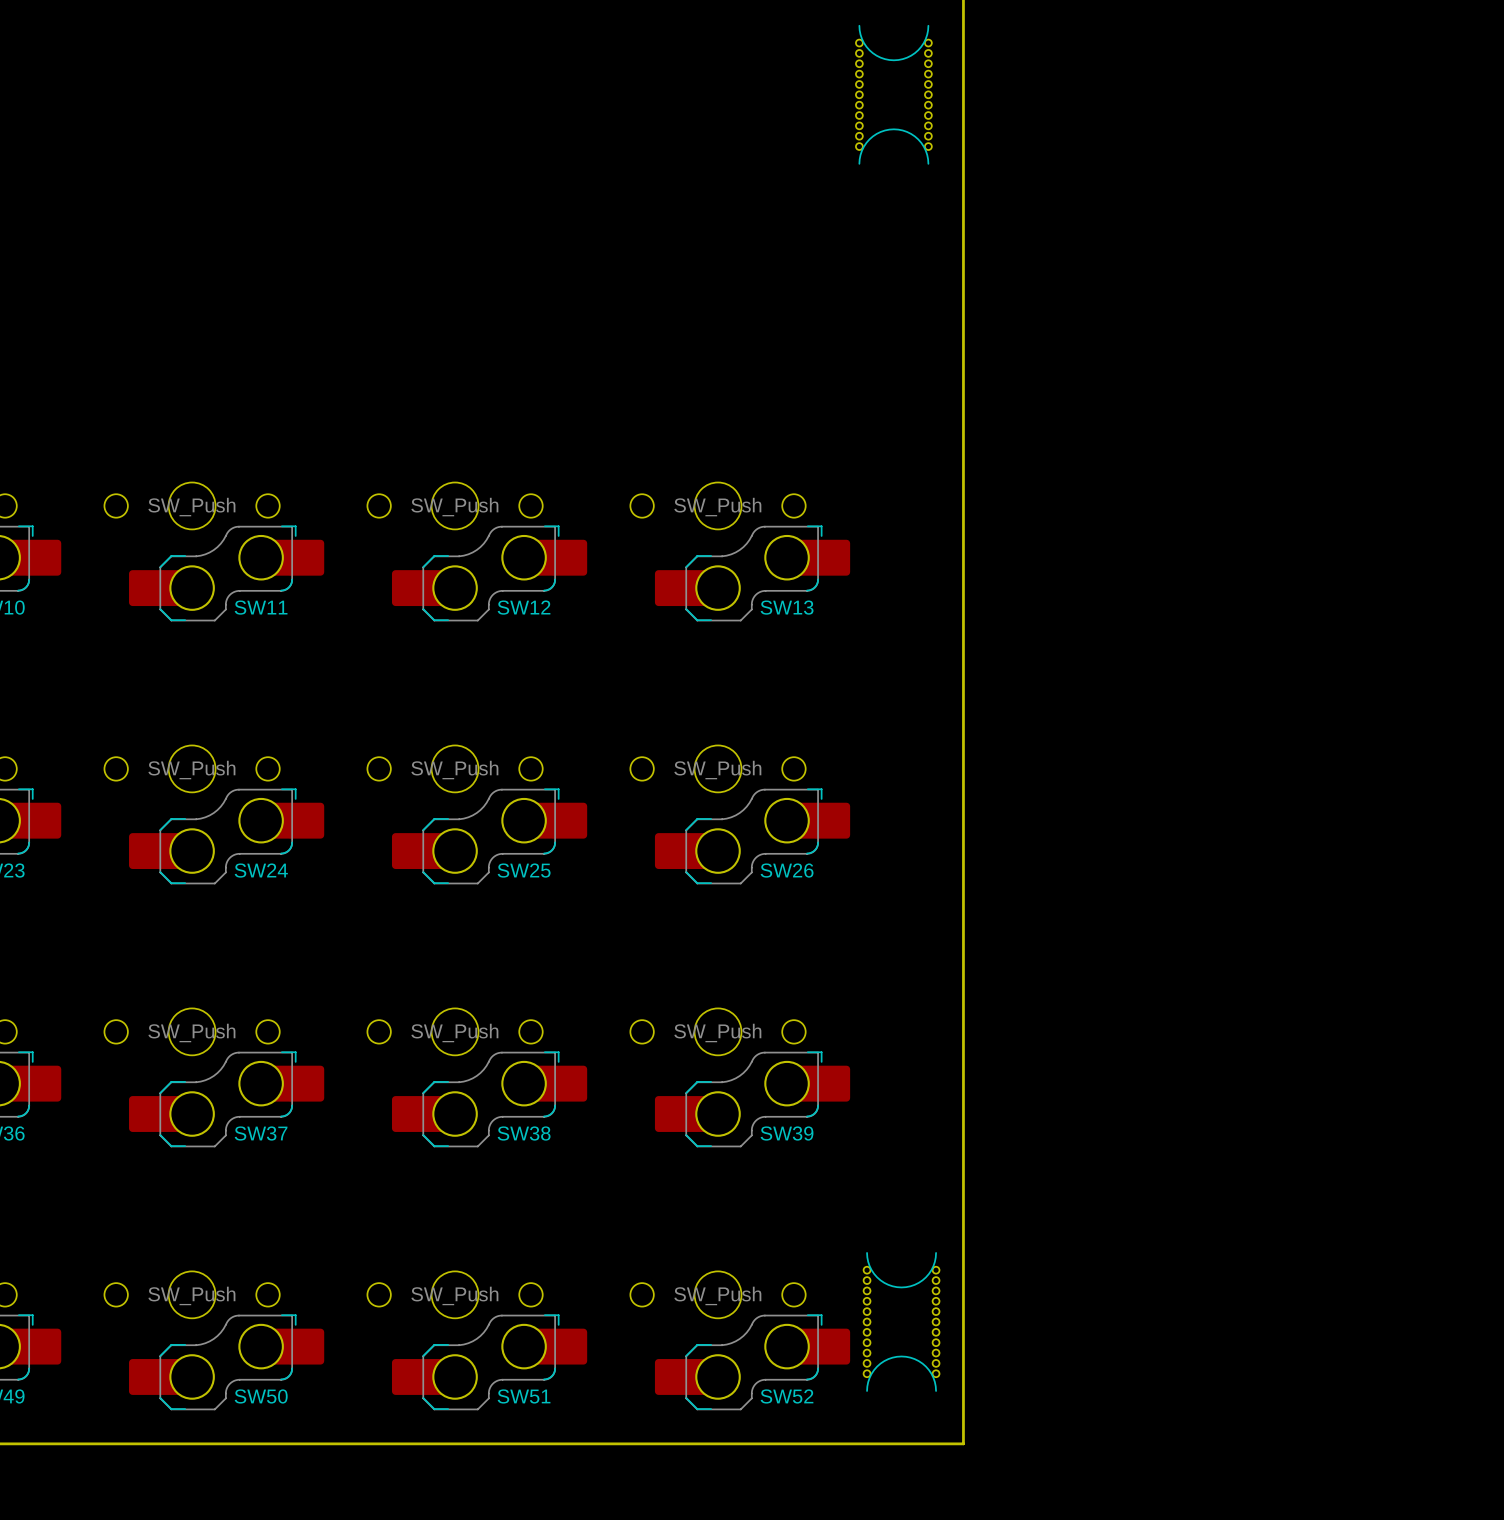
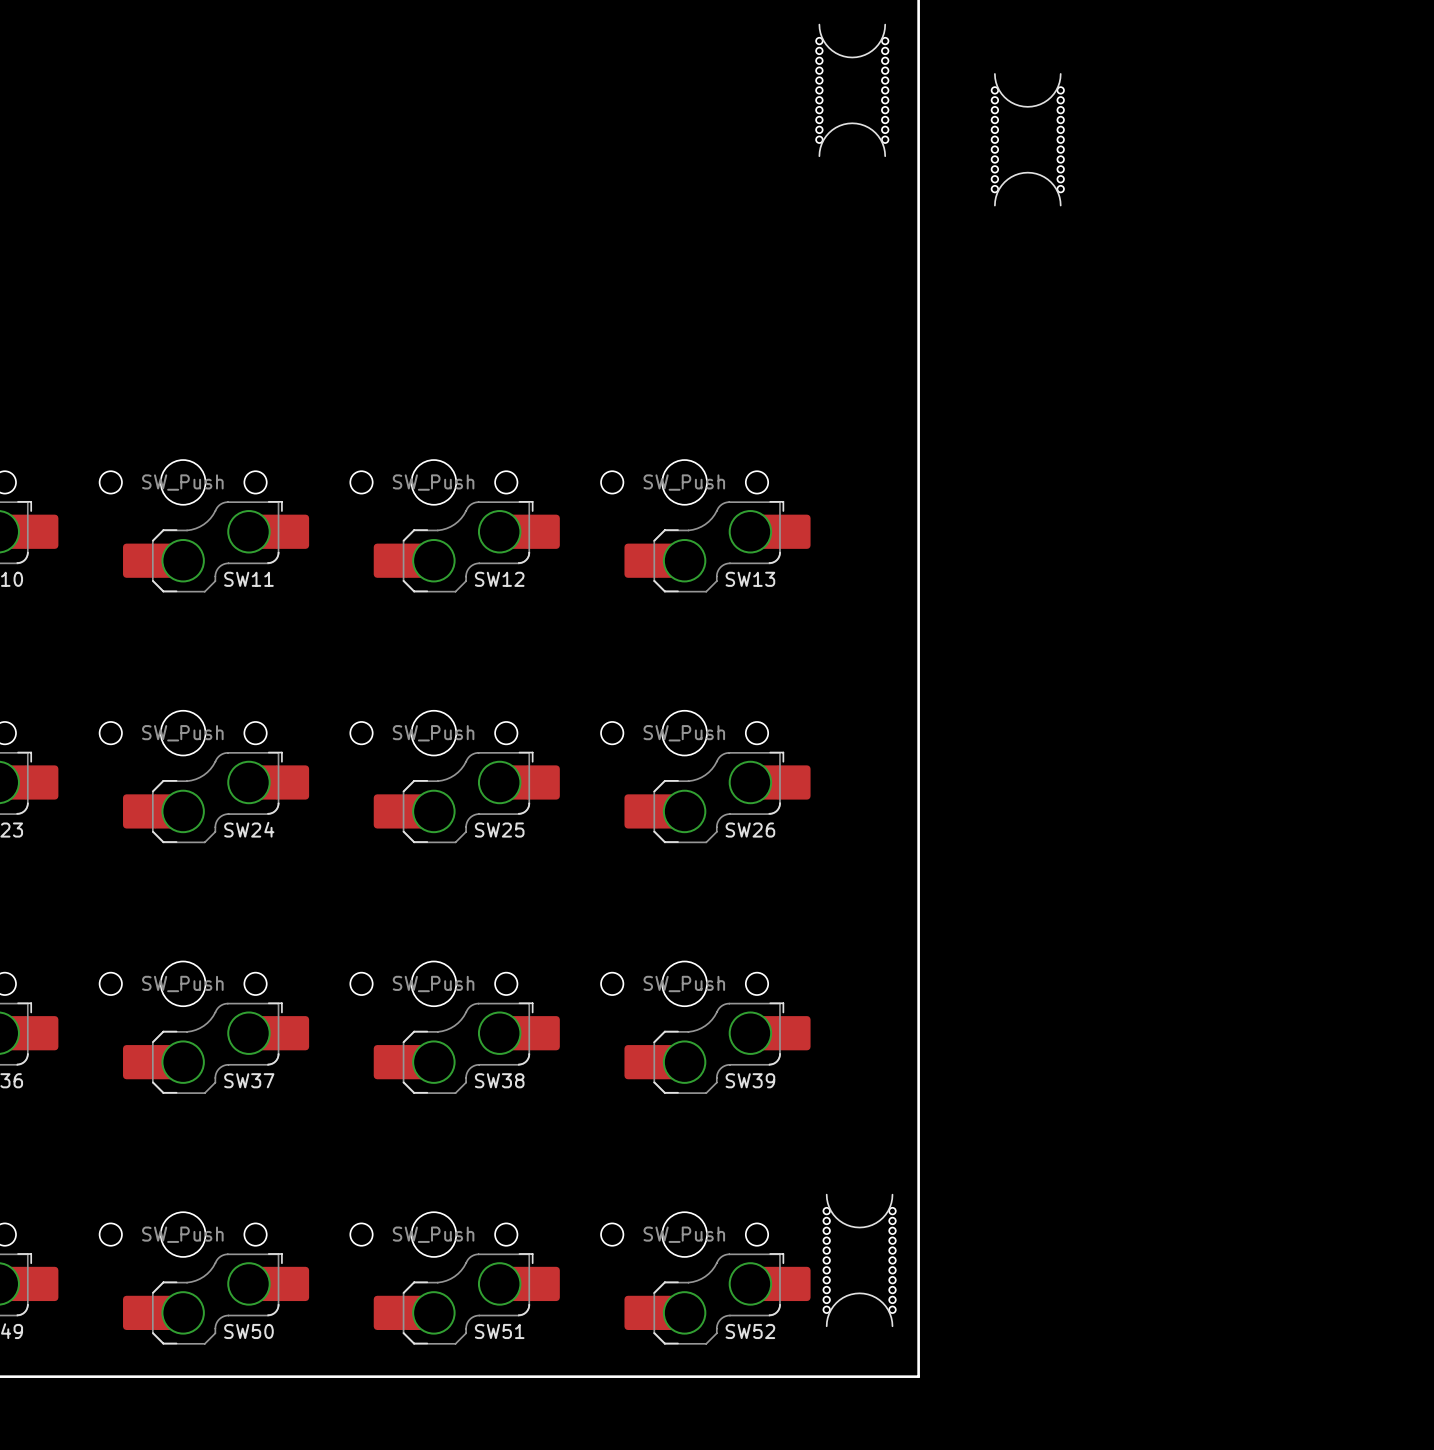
part: none -> (1027, 139)

